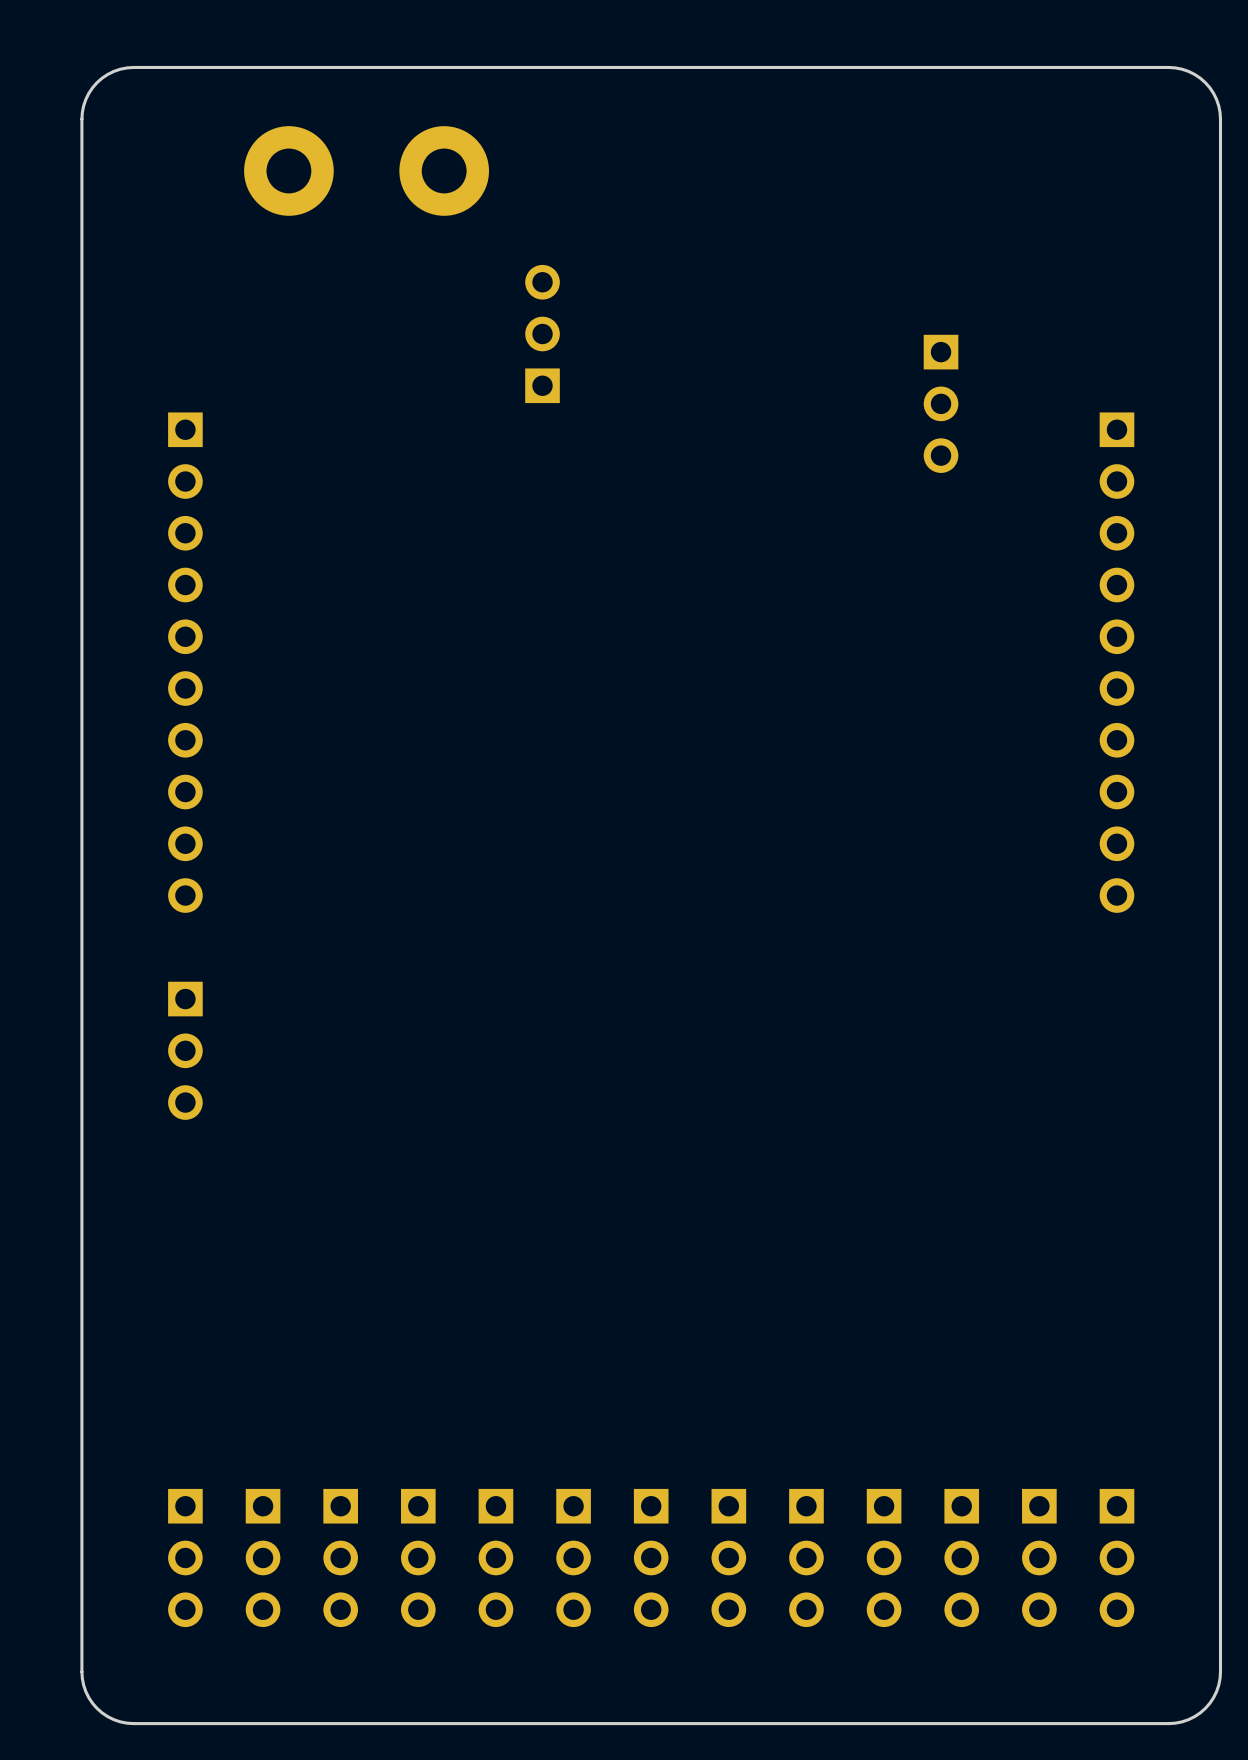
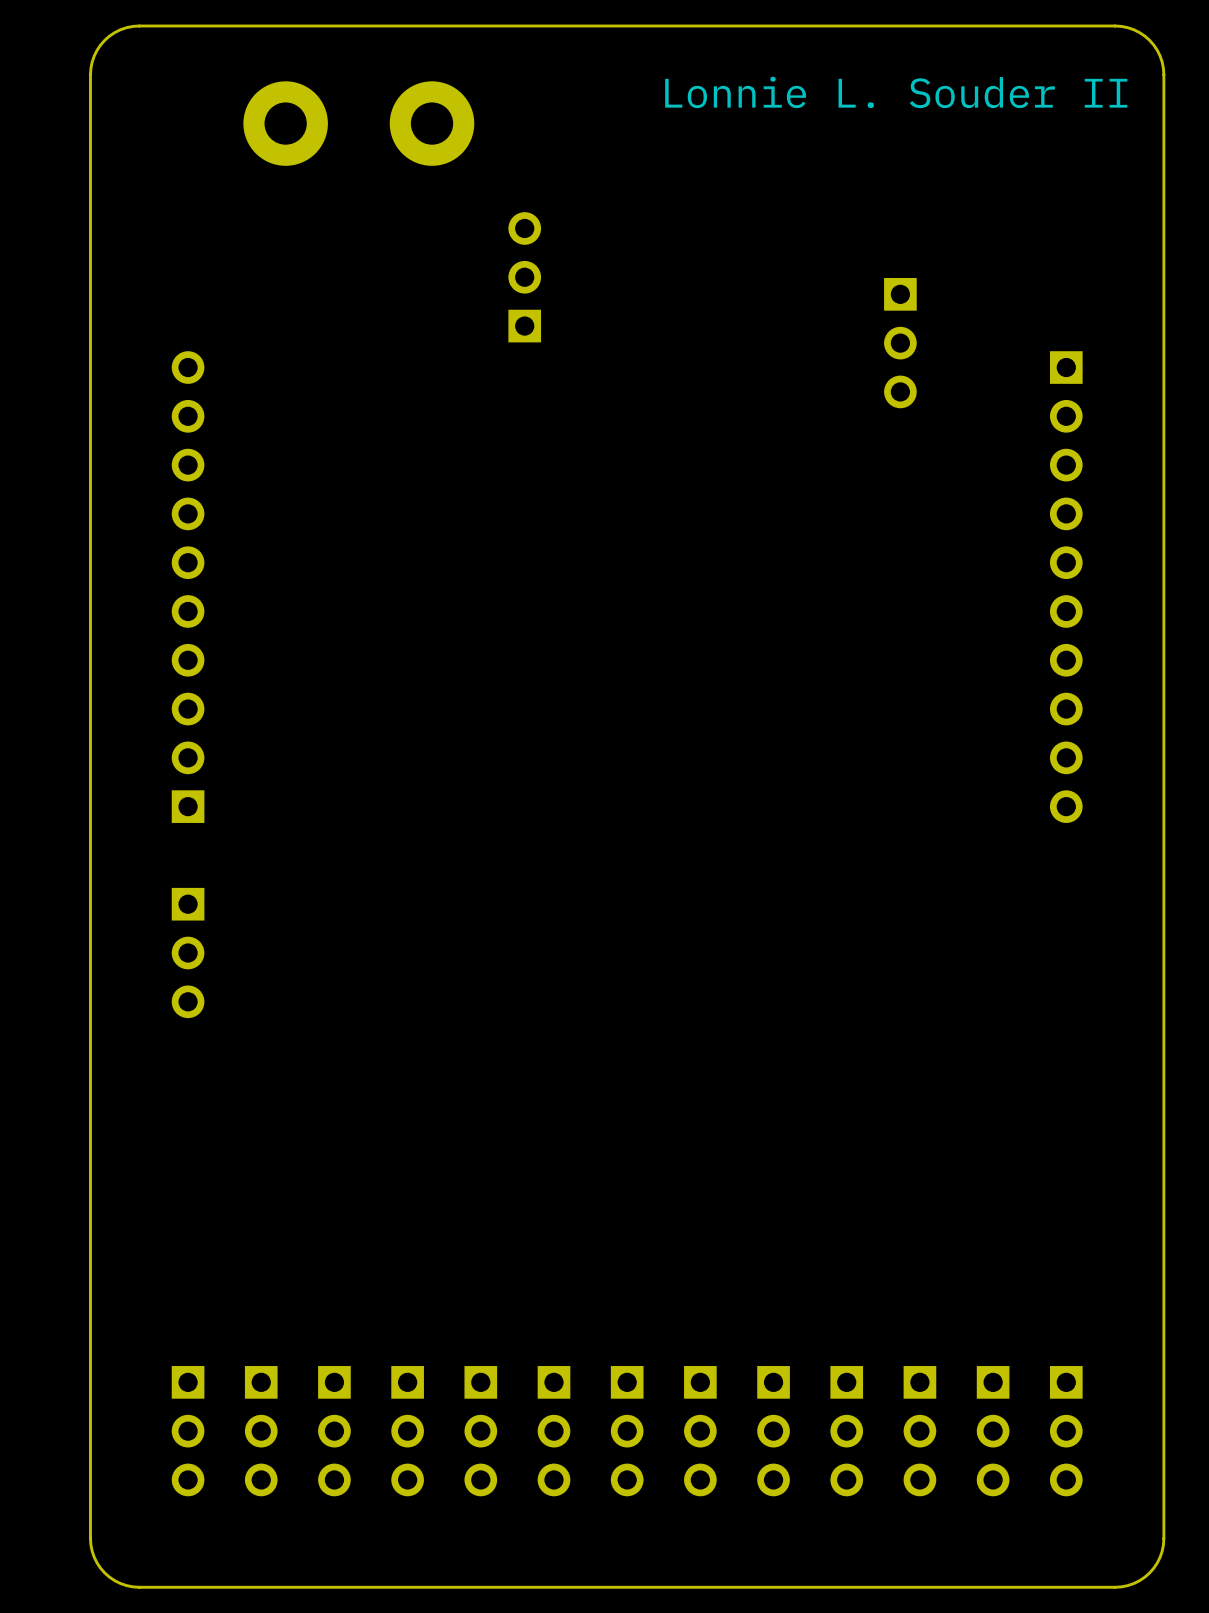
text: none -> Lonnie L. Souder II (896, 92)
part rotation: 0° (185, 662) -> 180° (188, 587)

